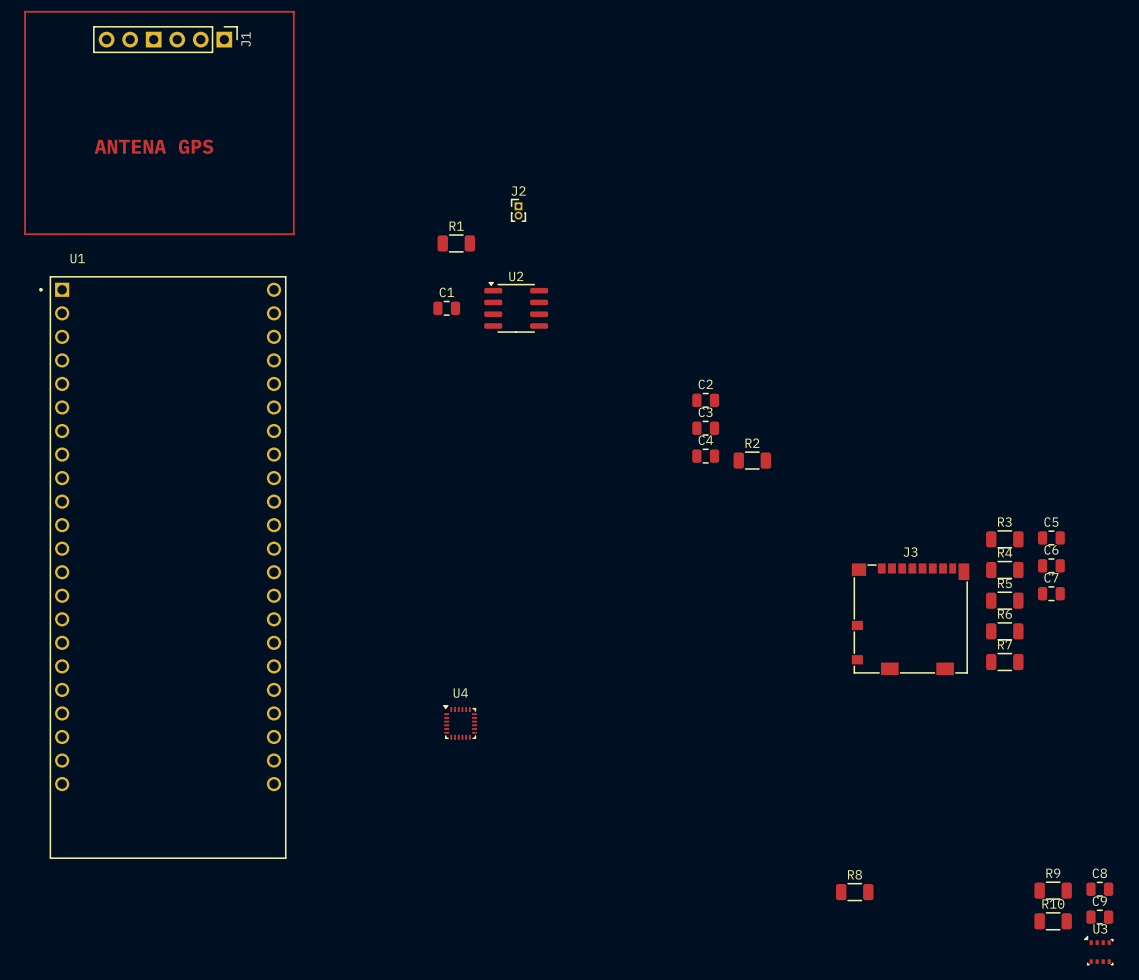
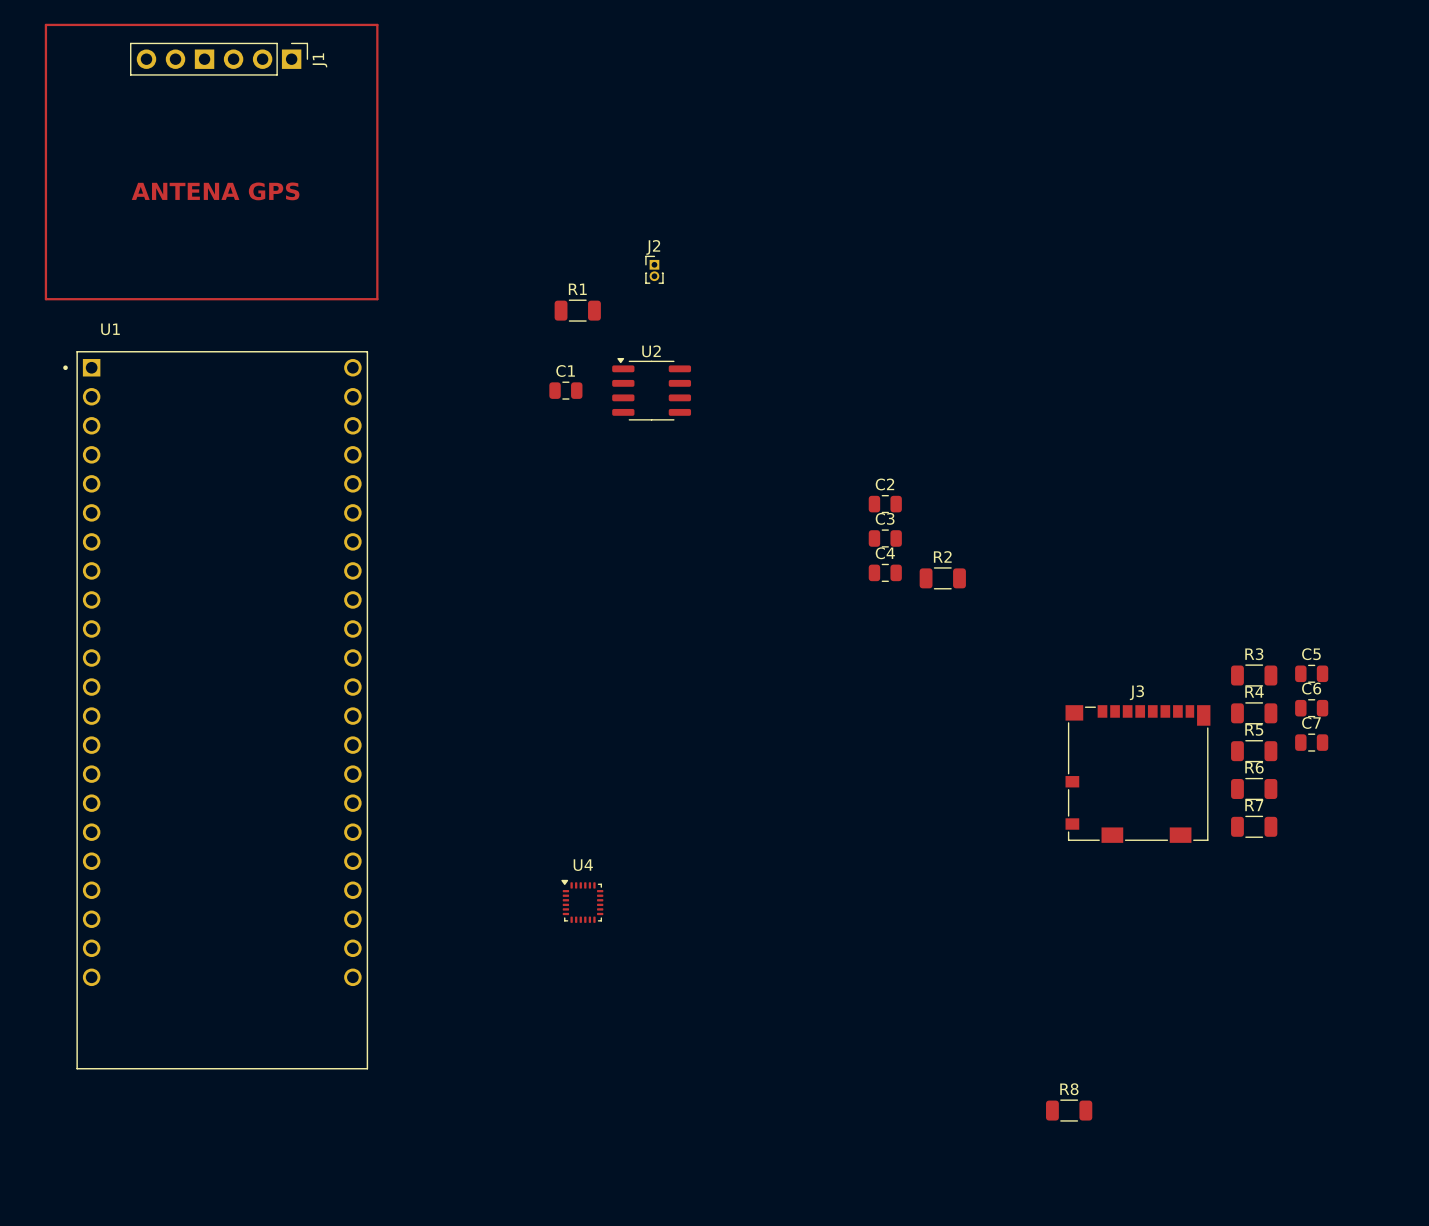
C8: (1099, 889) -> none
R9: (1053, 890) -> none
C9: (1099, 917) -> none
R10: (1053, 921) -> none
U3: (1098, 950) -> none

